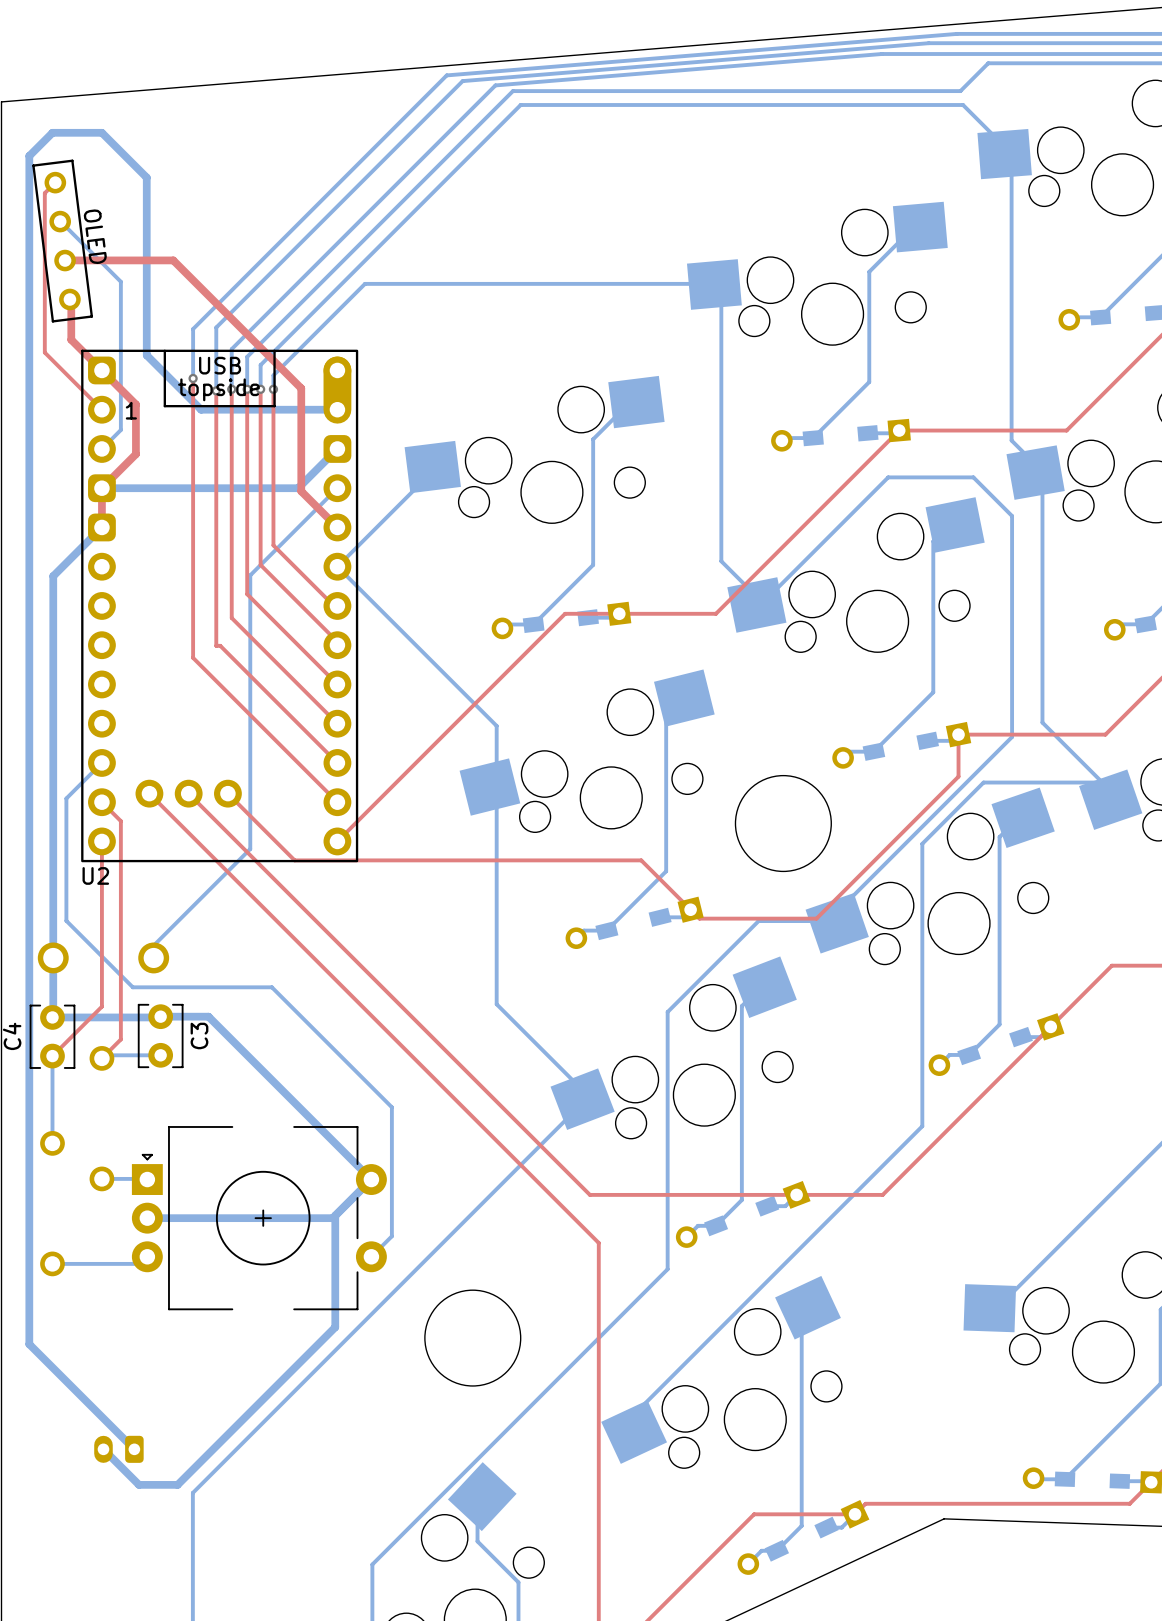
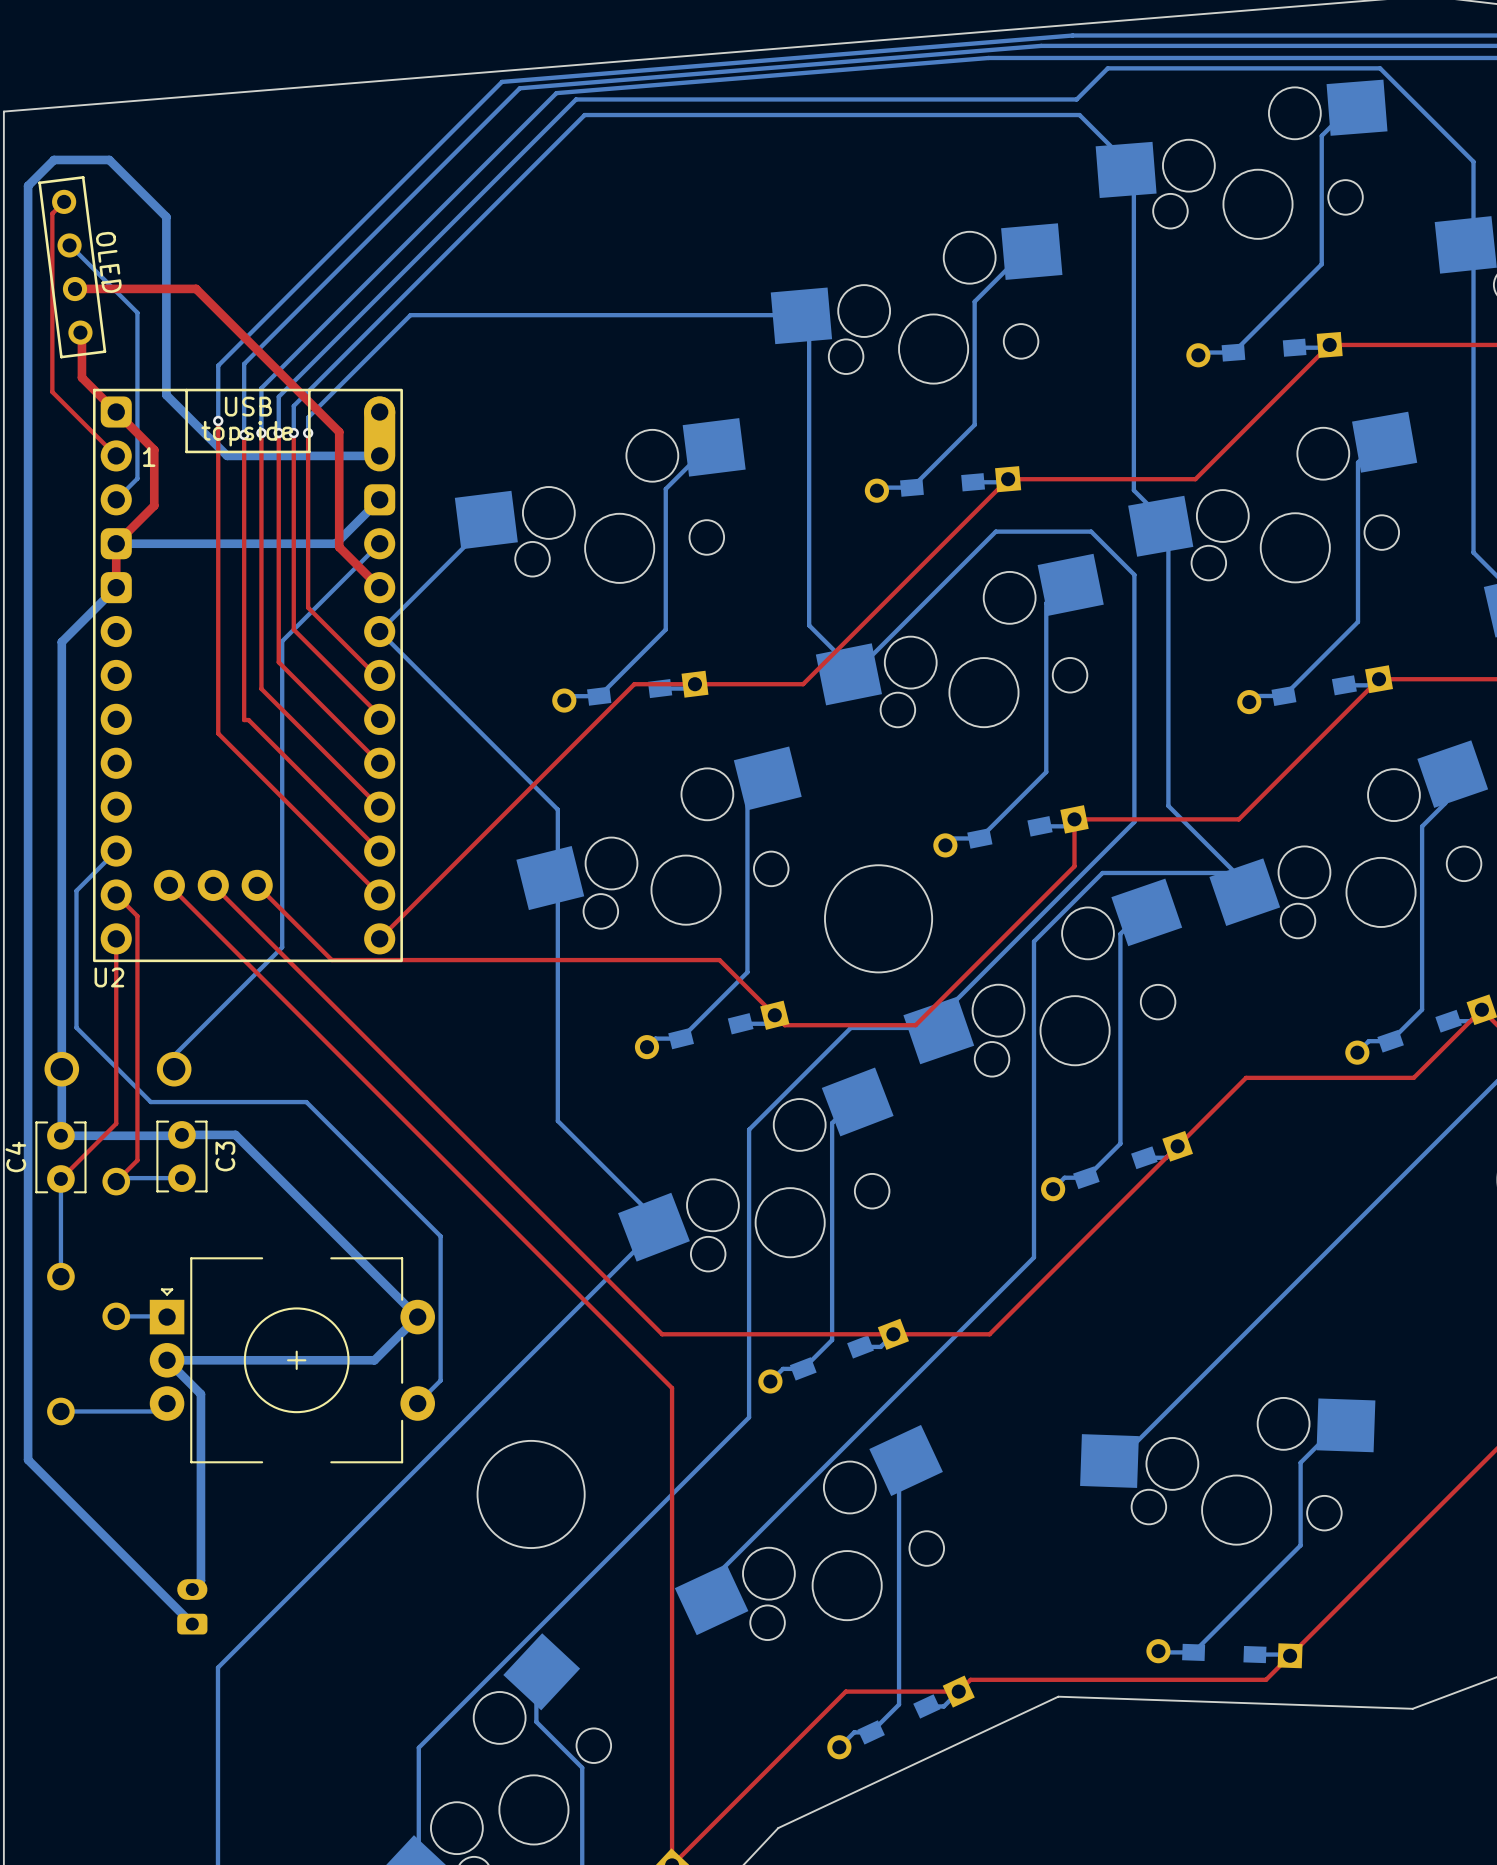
bottom track: (146, 196) (146, 177) (101, 132) (52, 132) (29, 155) (29, 1344) (134, 1449) -> (166, 217) (109, 159) (54, 159) (28, 185) (28, 1459) (192, 1624)
bottom track: (335, 1215) (335, 1327) (177, 1484) (139, 1484) (103, 1449) -> none
bottom track: none -> (167, 1360) (200, 1394) (200, 1580) (192, 1589)
part rotation: 0° (118, 1449) -> 90° clockwise (192, 1606)
part position: (118, 1449) -> (192, 1606)

